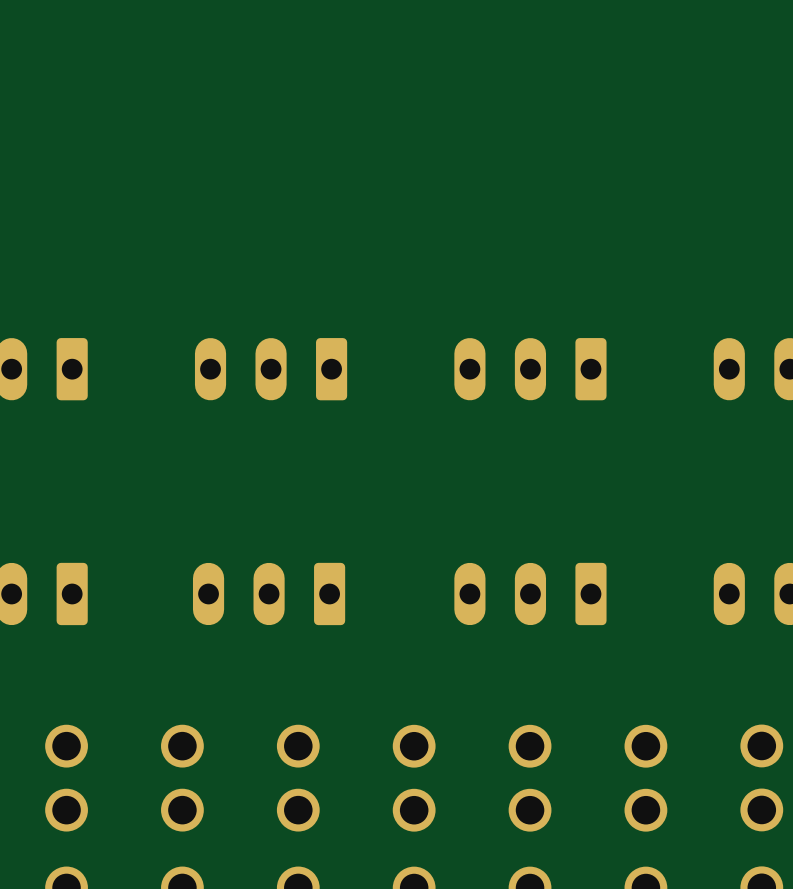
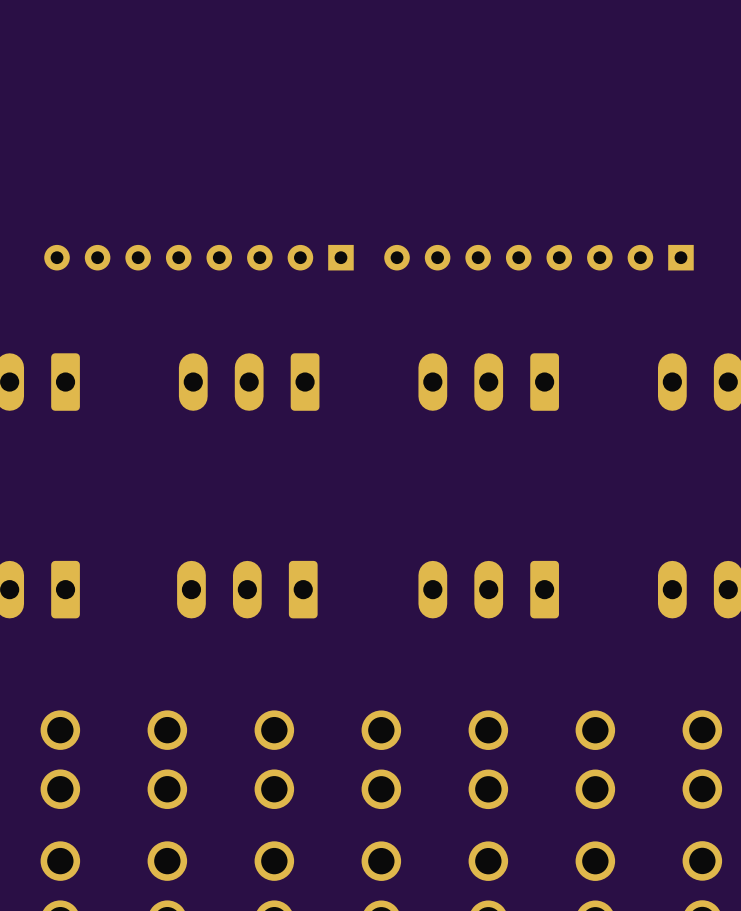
part: none -> (198, 257)
part: none -> (539, 257)

